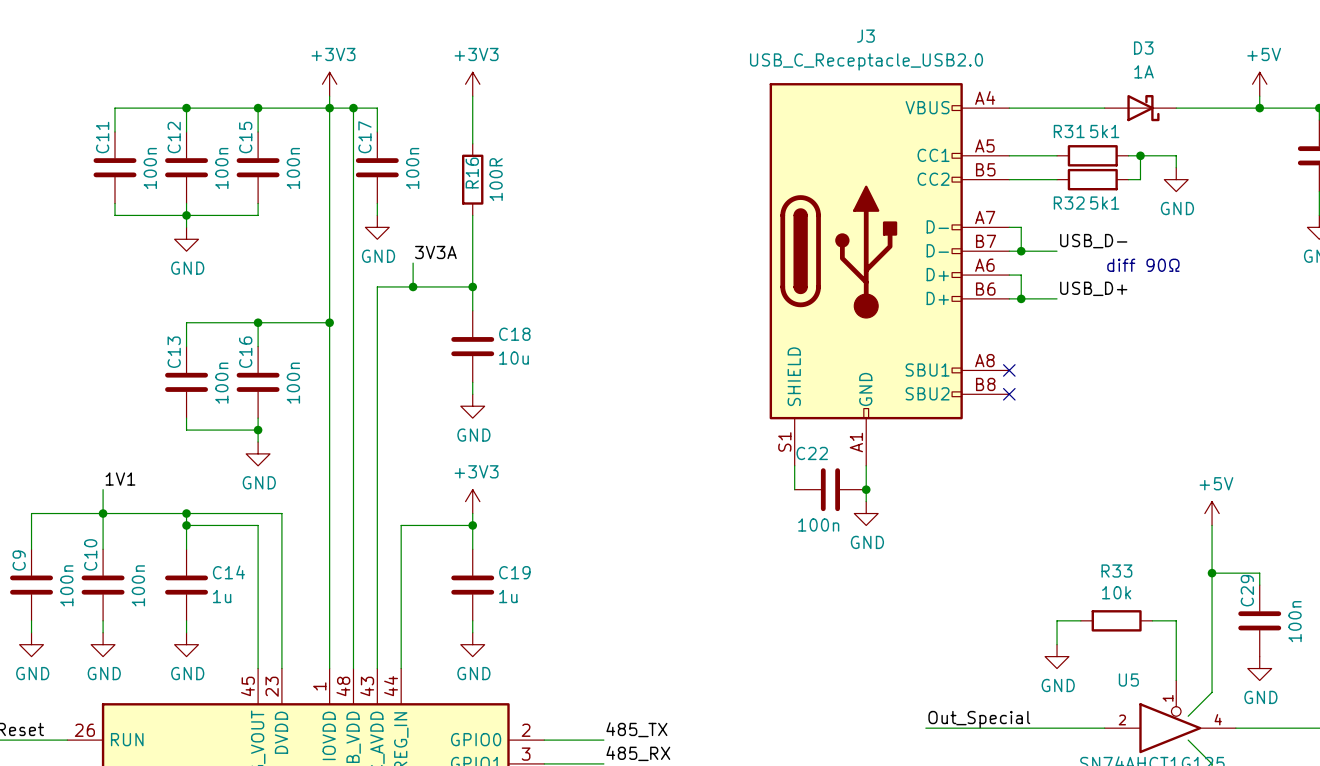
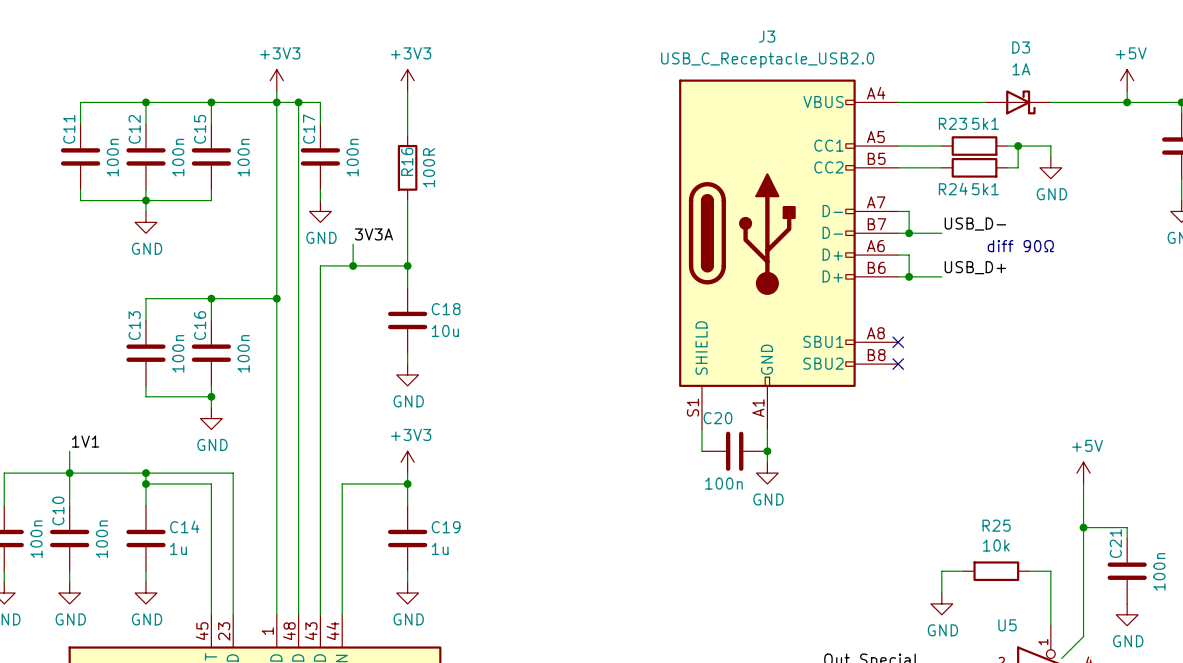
R31 name: R31 (1069, 131) -> R23 (952, 123)
R32 name: R32 (1069, 203) -> R24 (953, 188)
C22 name: C22 (812, 453) -> C20 (717, 418)
R33 name: R33 (1116, 571) -> R25 (996, 525)
C29 name: C29 (1247, 590) -> C21 (1115, 543)

